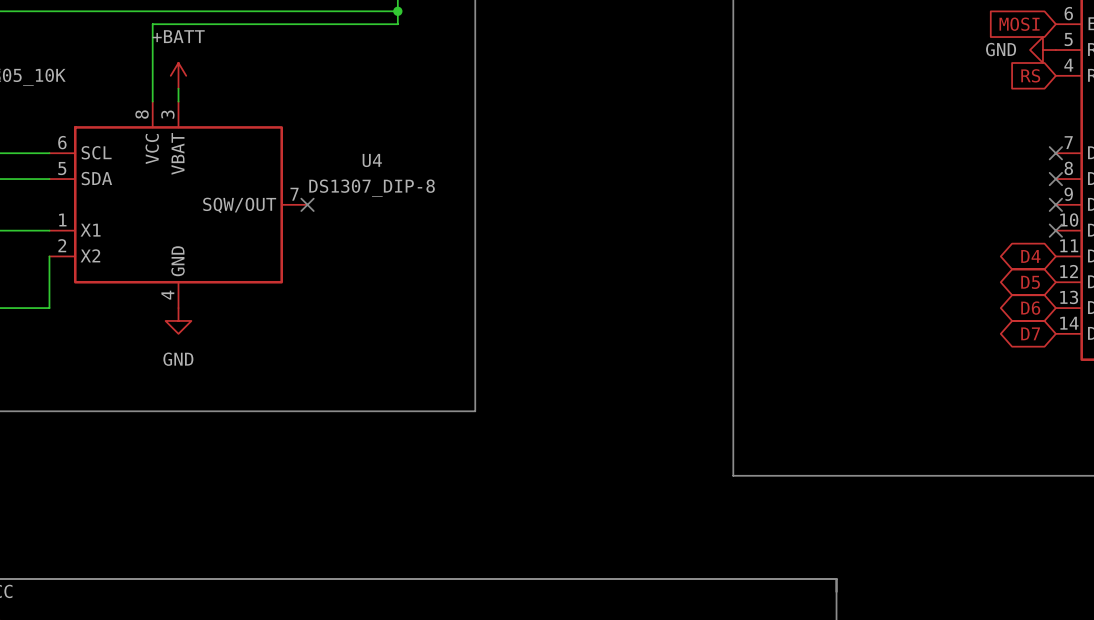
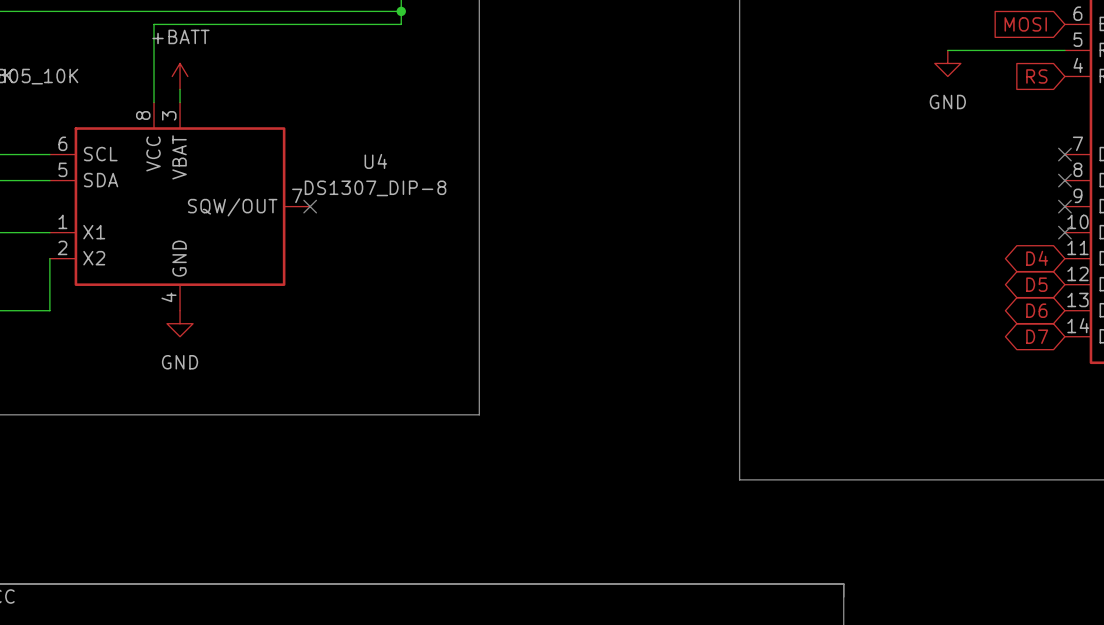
wire: none -> (947, 50) (1064, 50)
power symbol rotation: 0° (1042, 50) -> 90° counterclockwise (947, 63)
power symbol position: GND (1042, 50) -> GND (947, 63)

